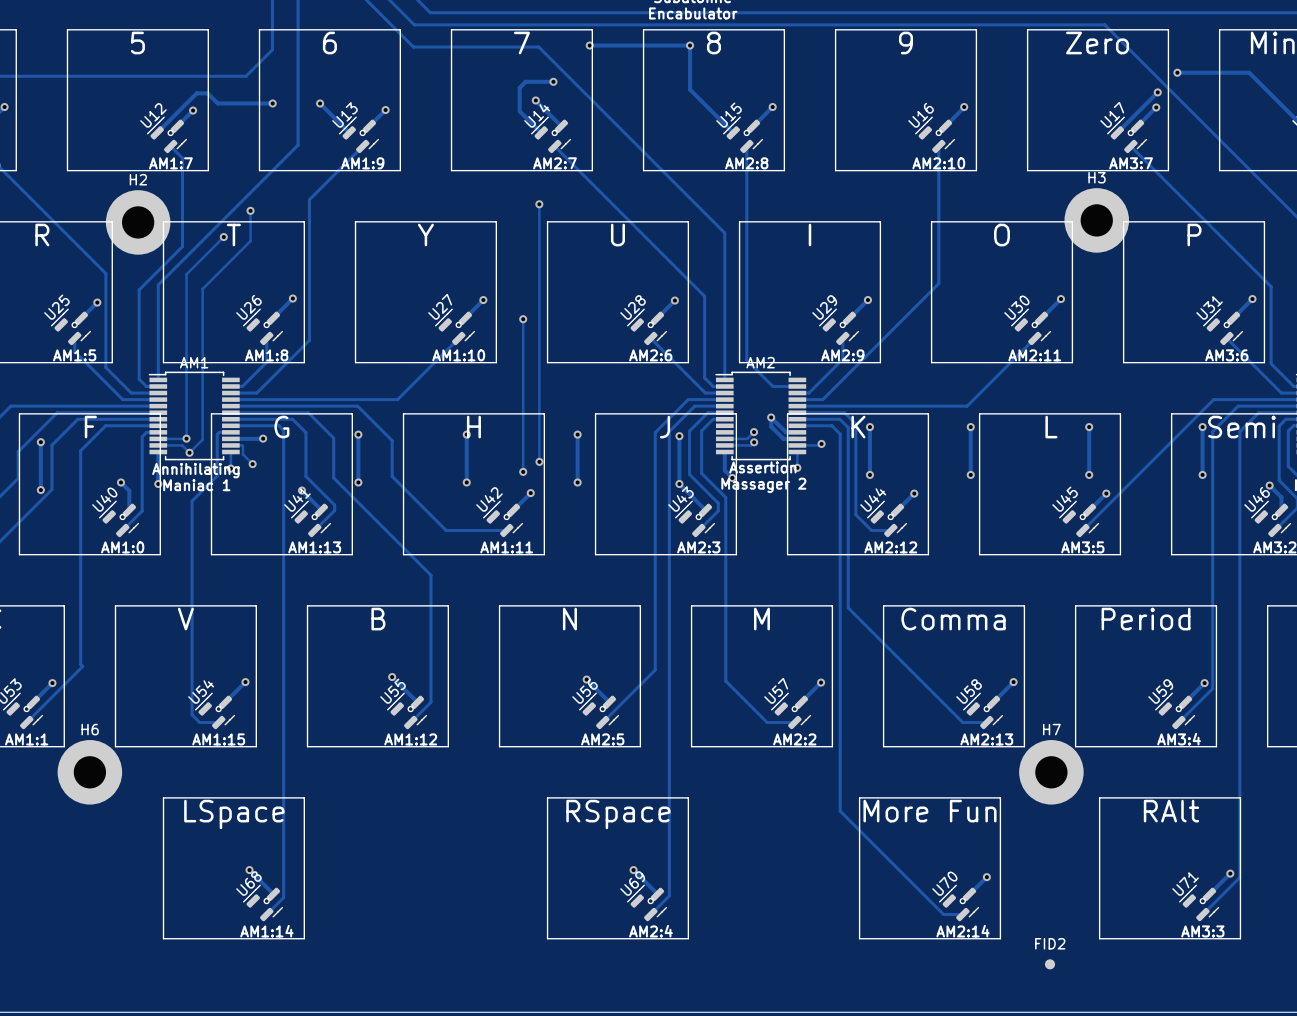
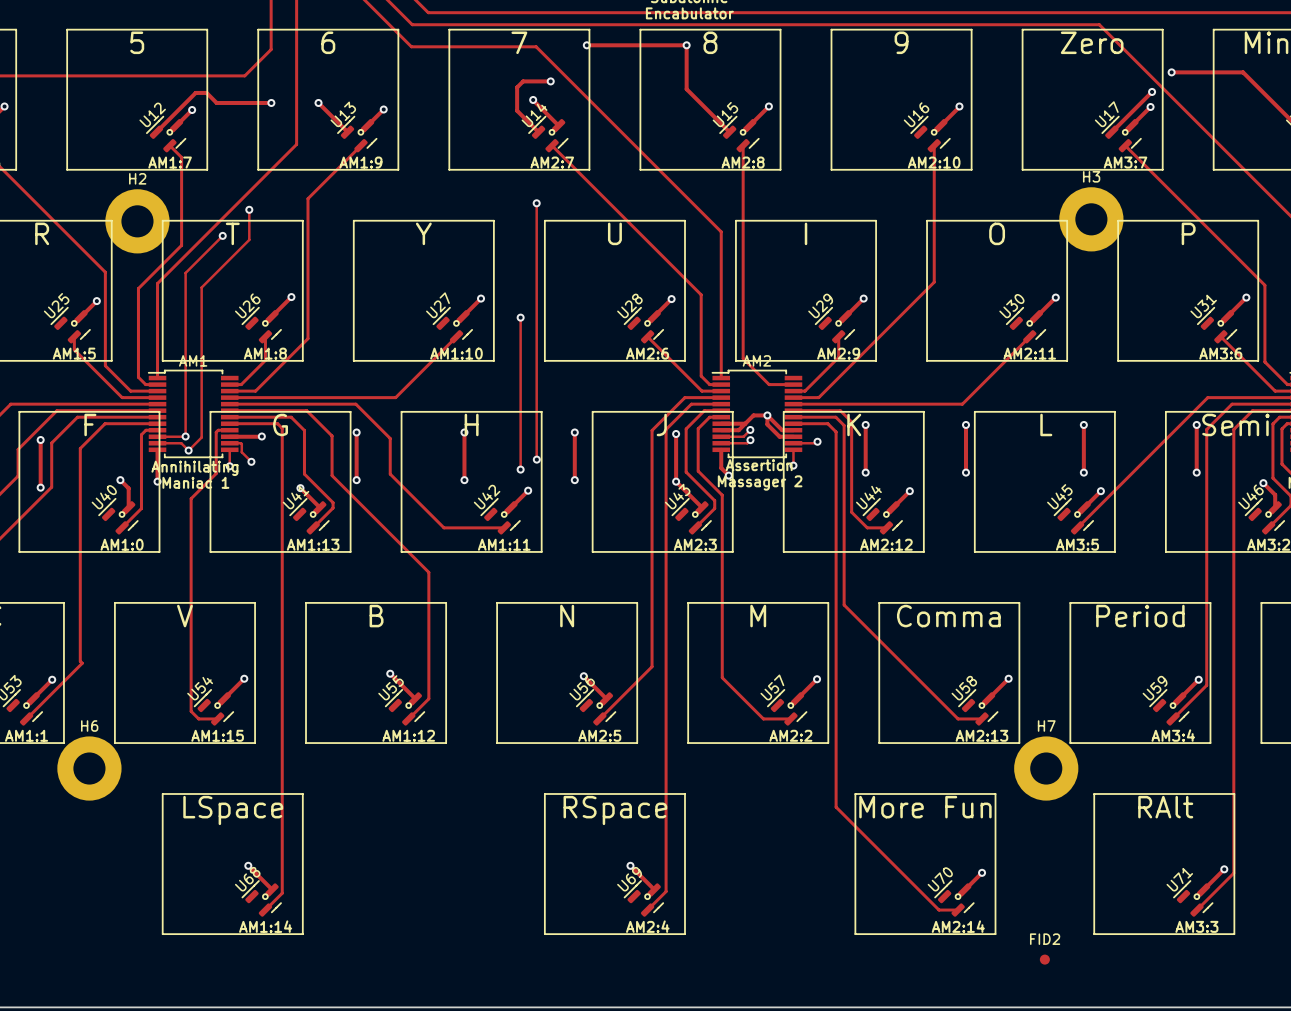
track: none -> (767, 415) (753, 415) (738, 430) (721, 430)
track: none -> (721, 423) (745, 423)

